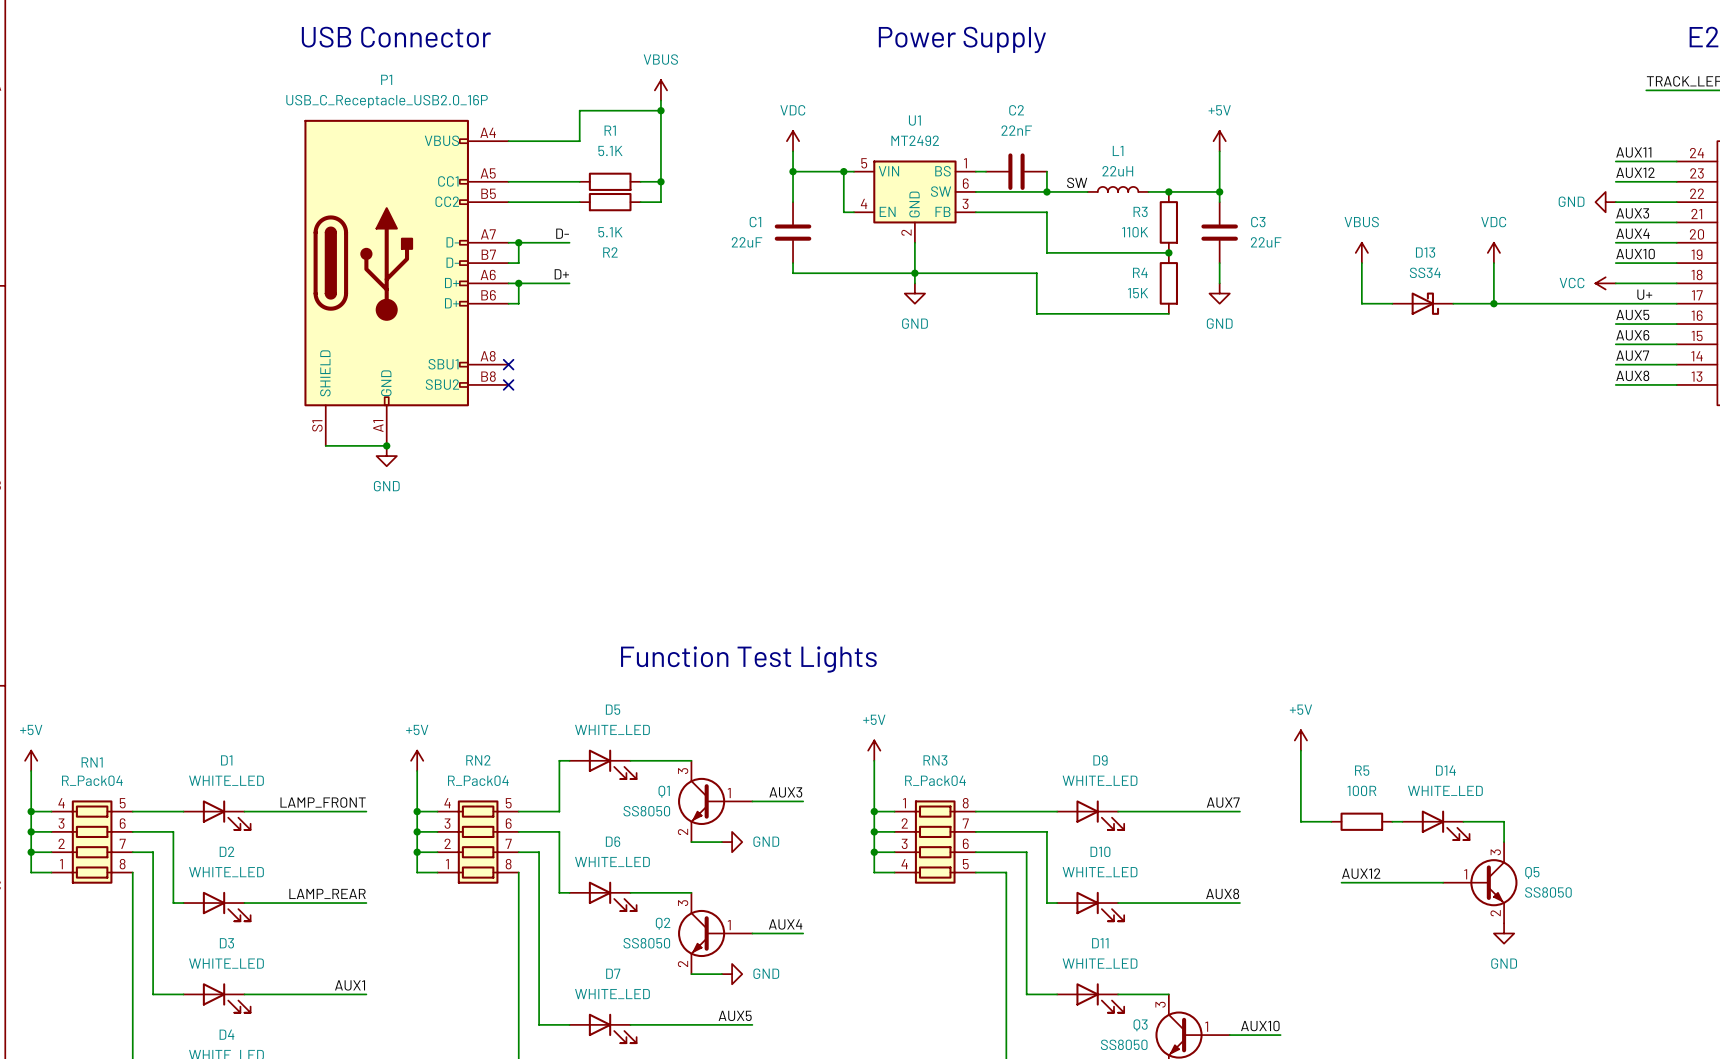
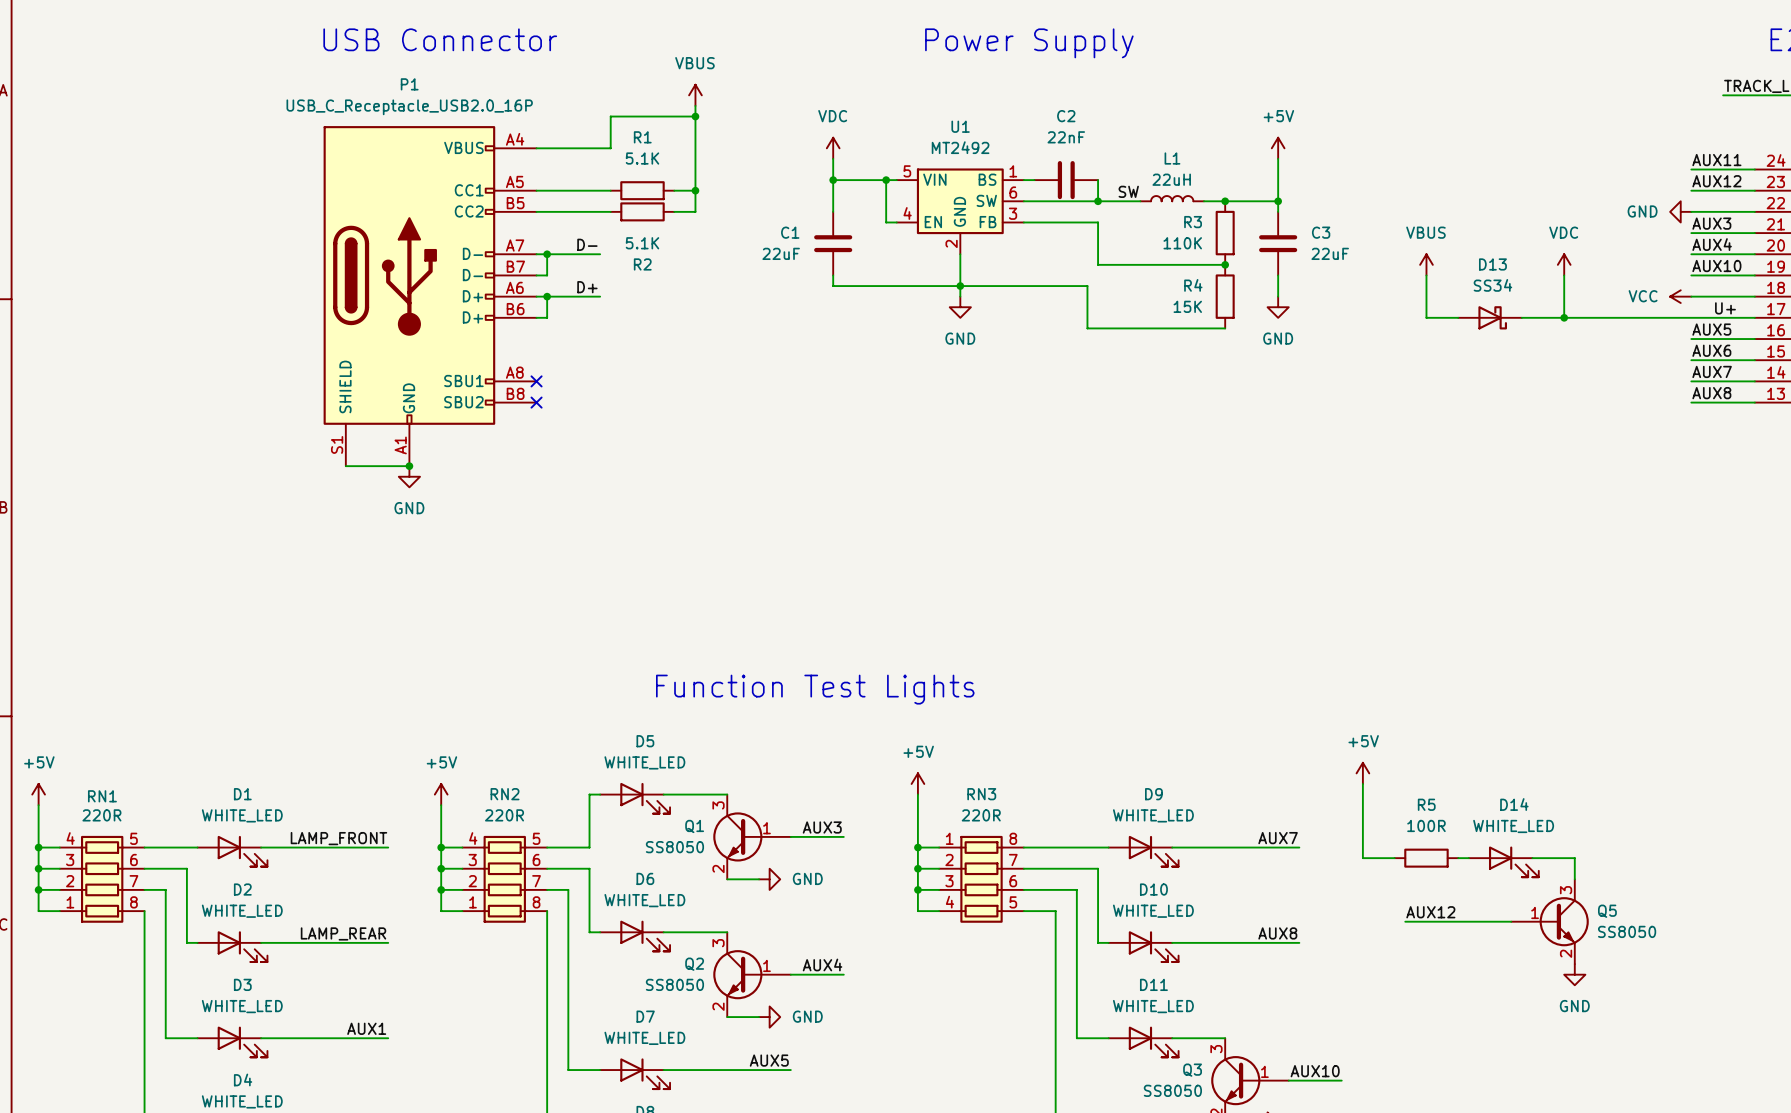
RN1 value: R_Pack04 (92, 780) -> 220R (101, 815)
RN2 value: R_Pack04 (478, 780) -> 220R (504, 815)
RN3 value: R_Pack04 (935, 780) -> 220R (981, 815)

